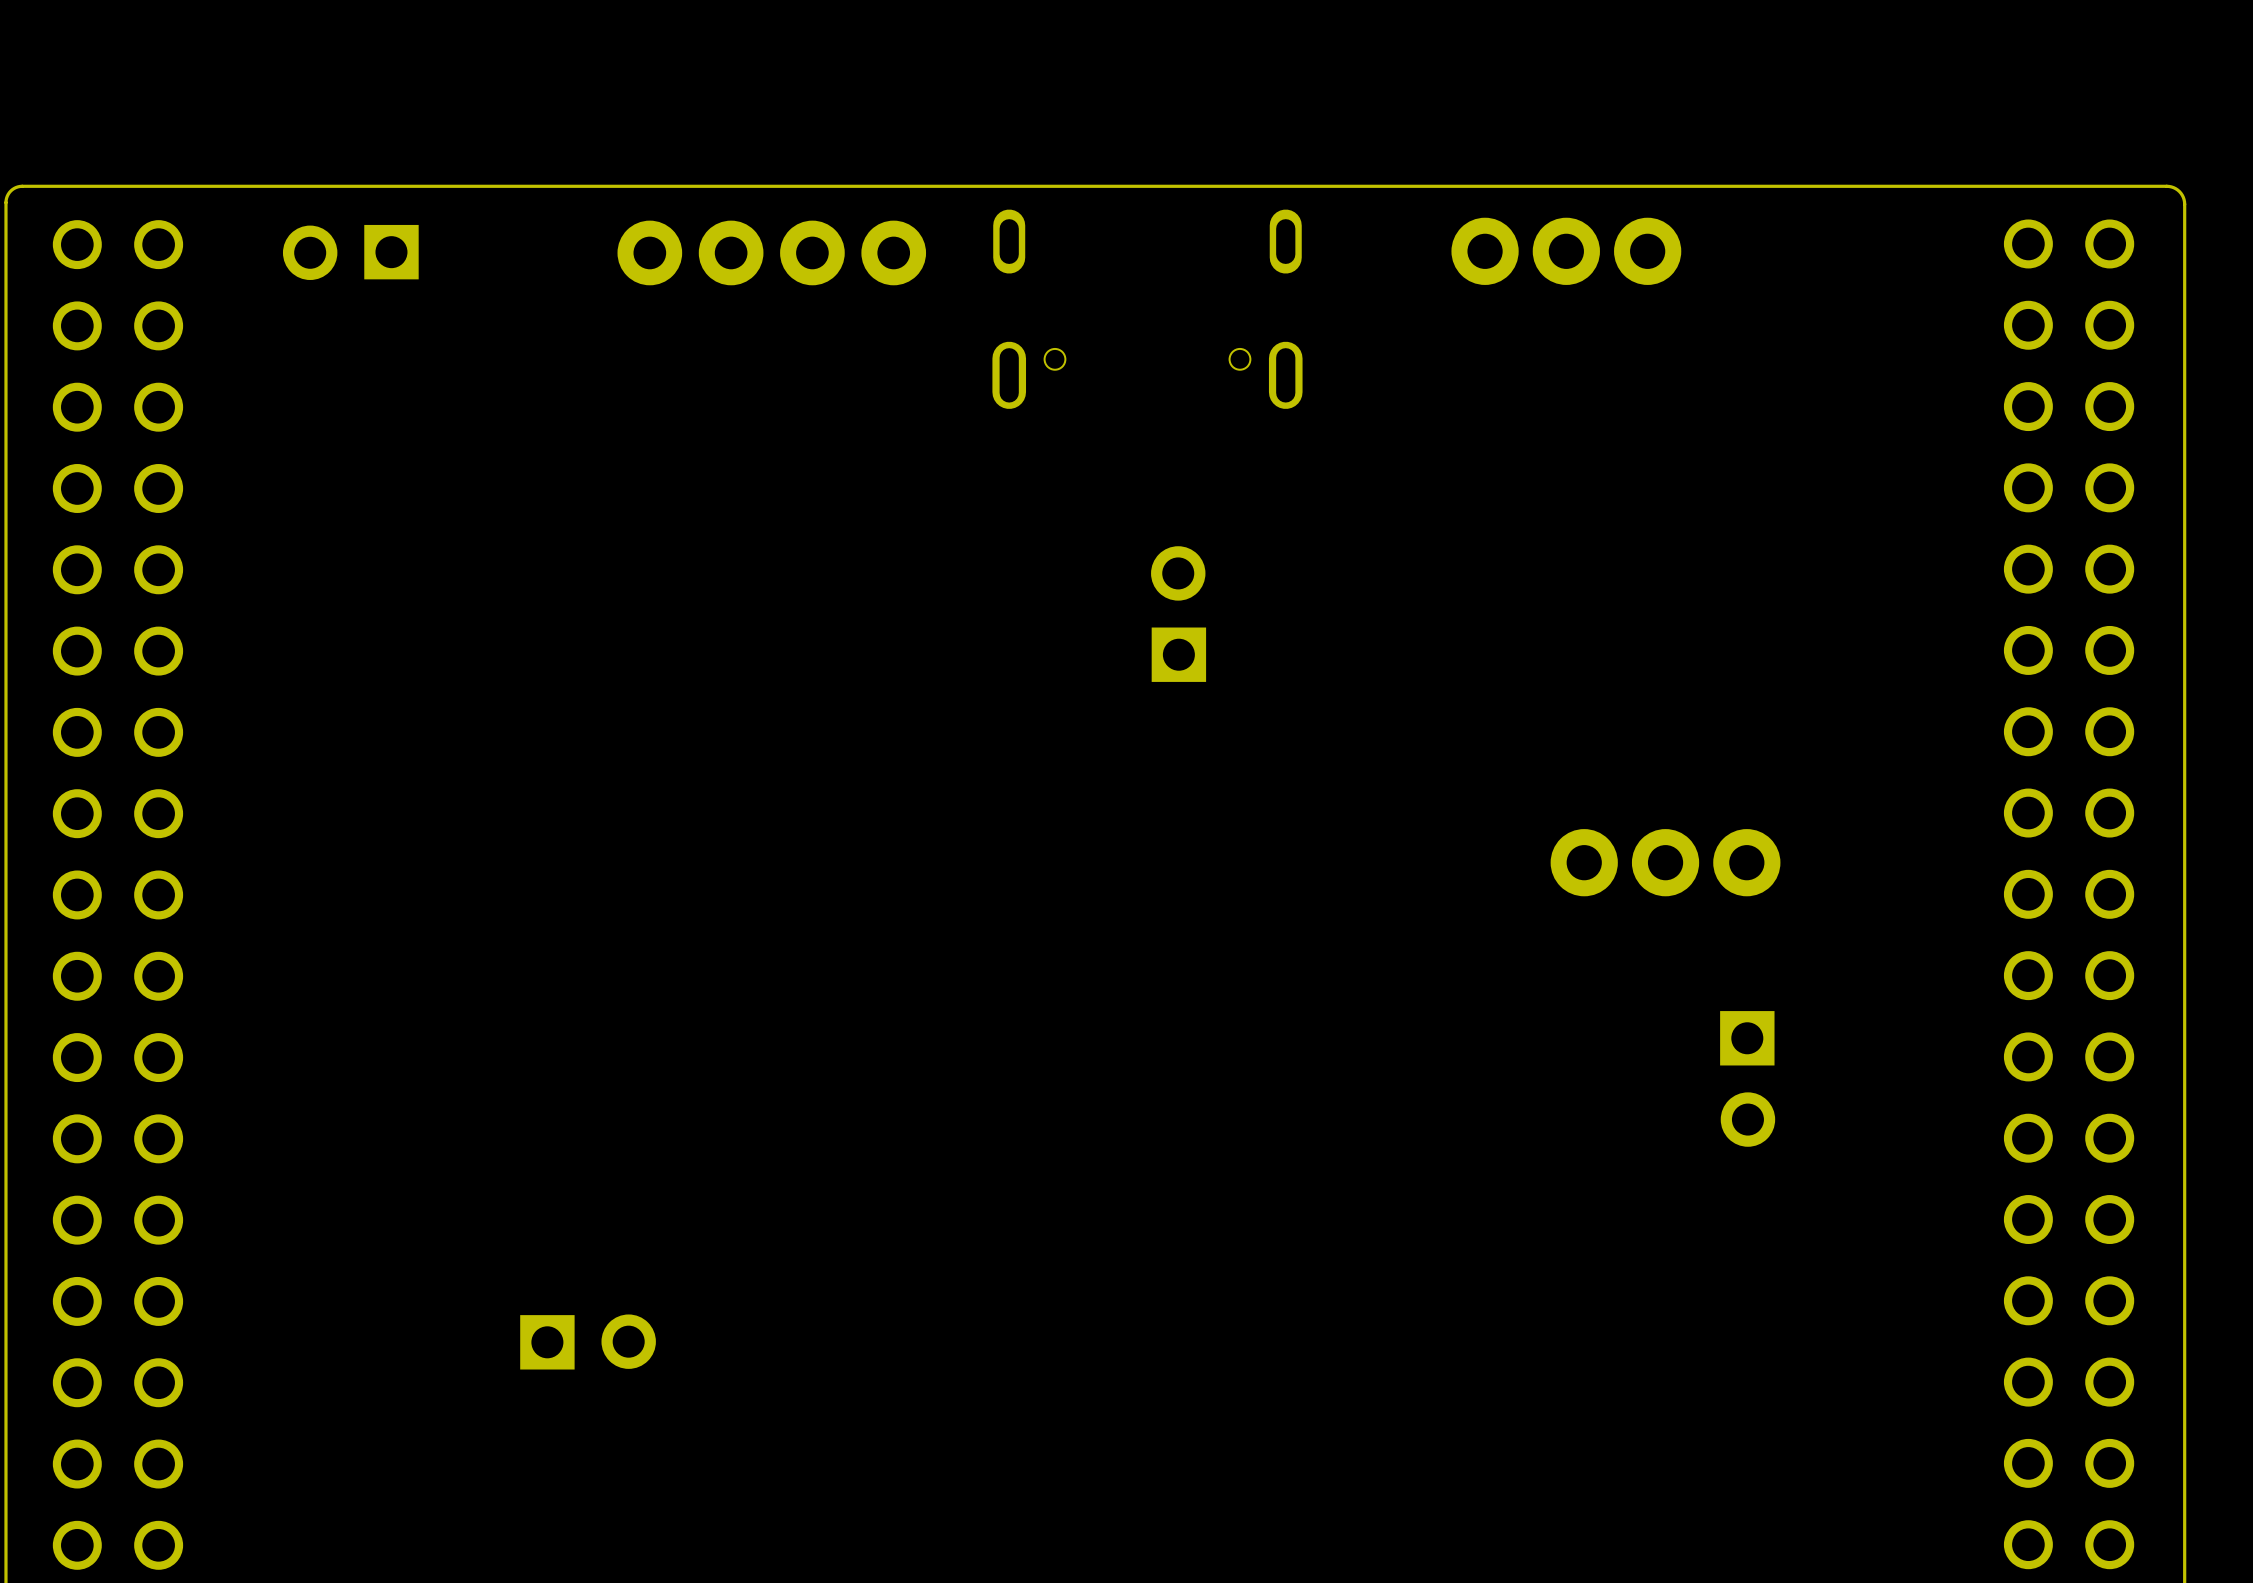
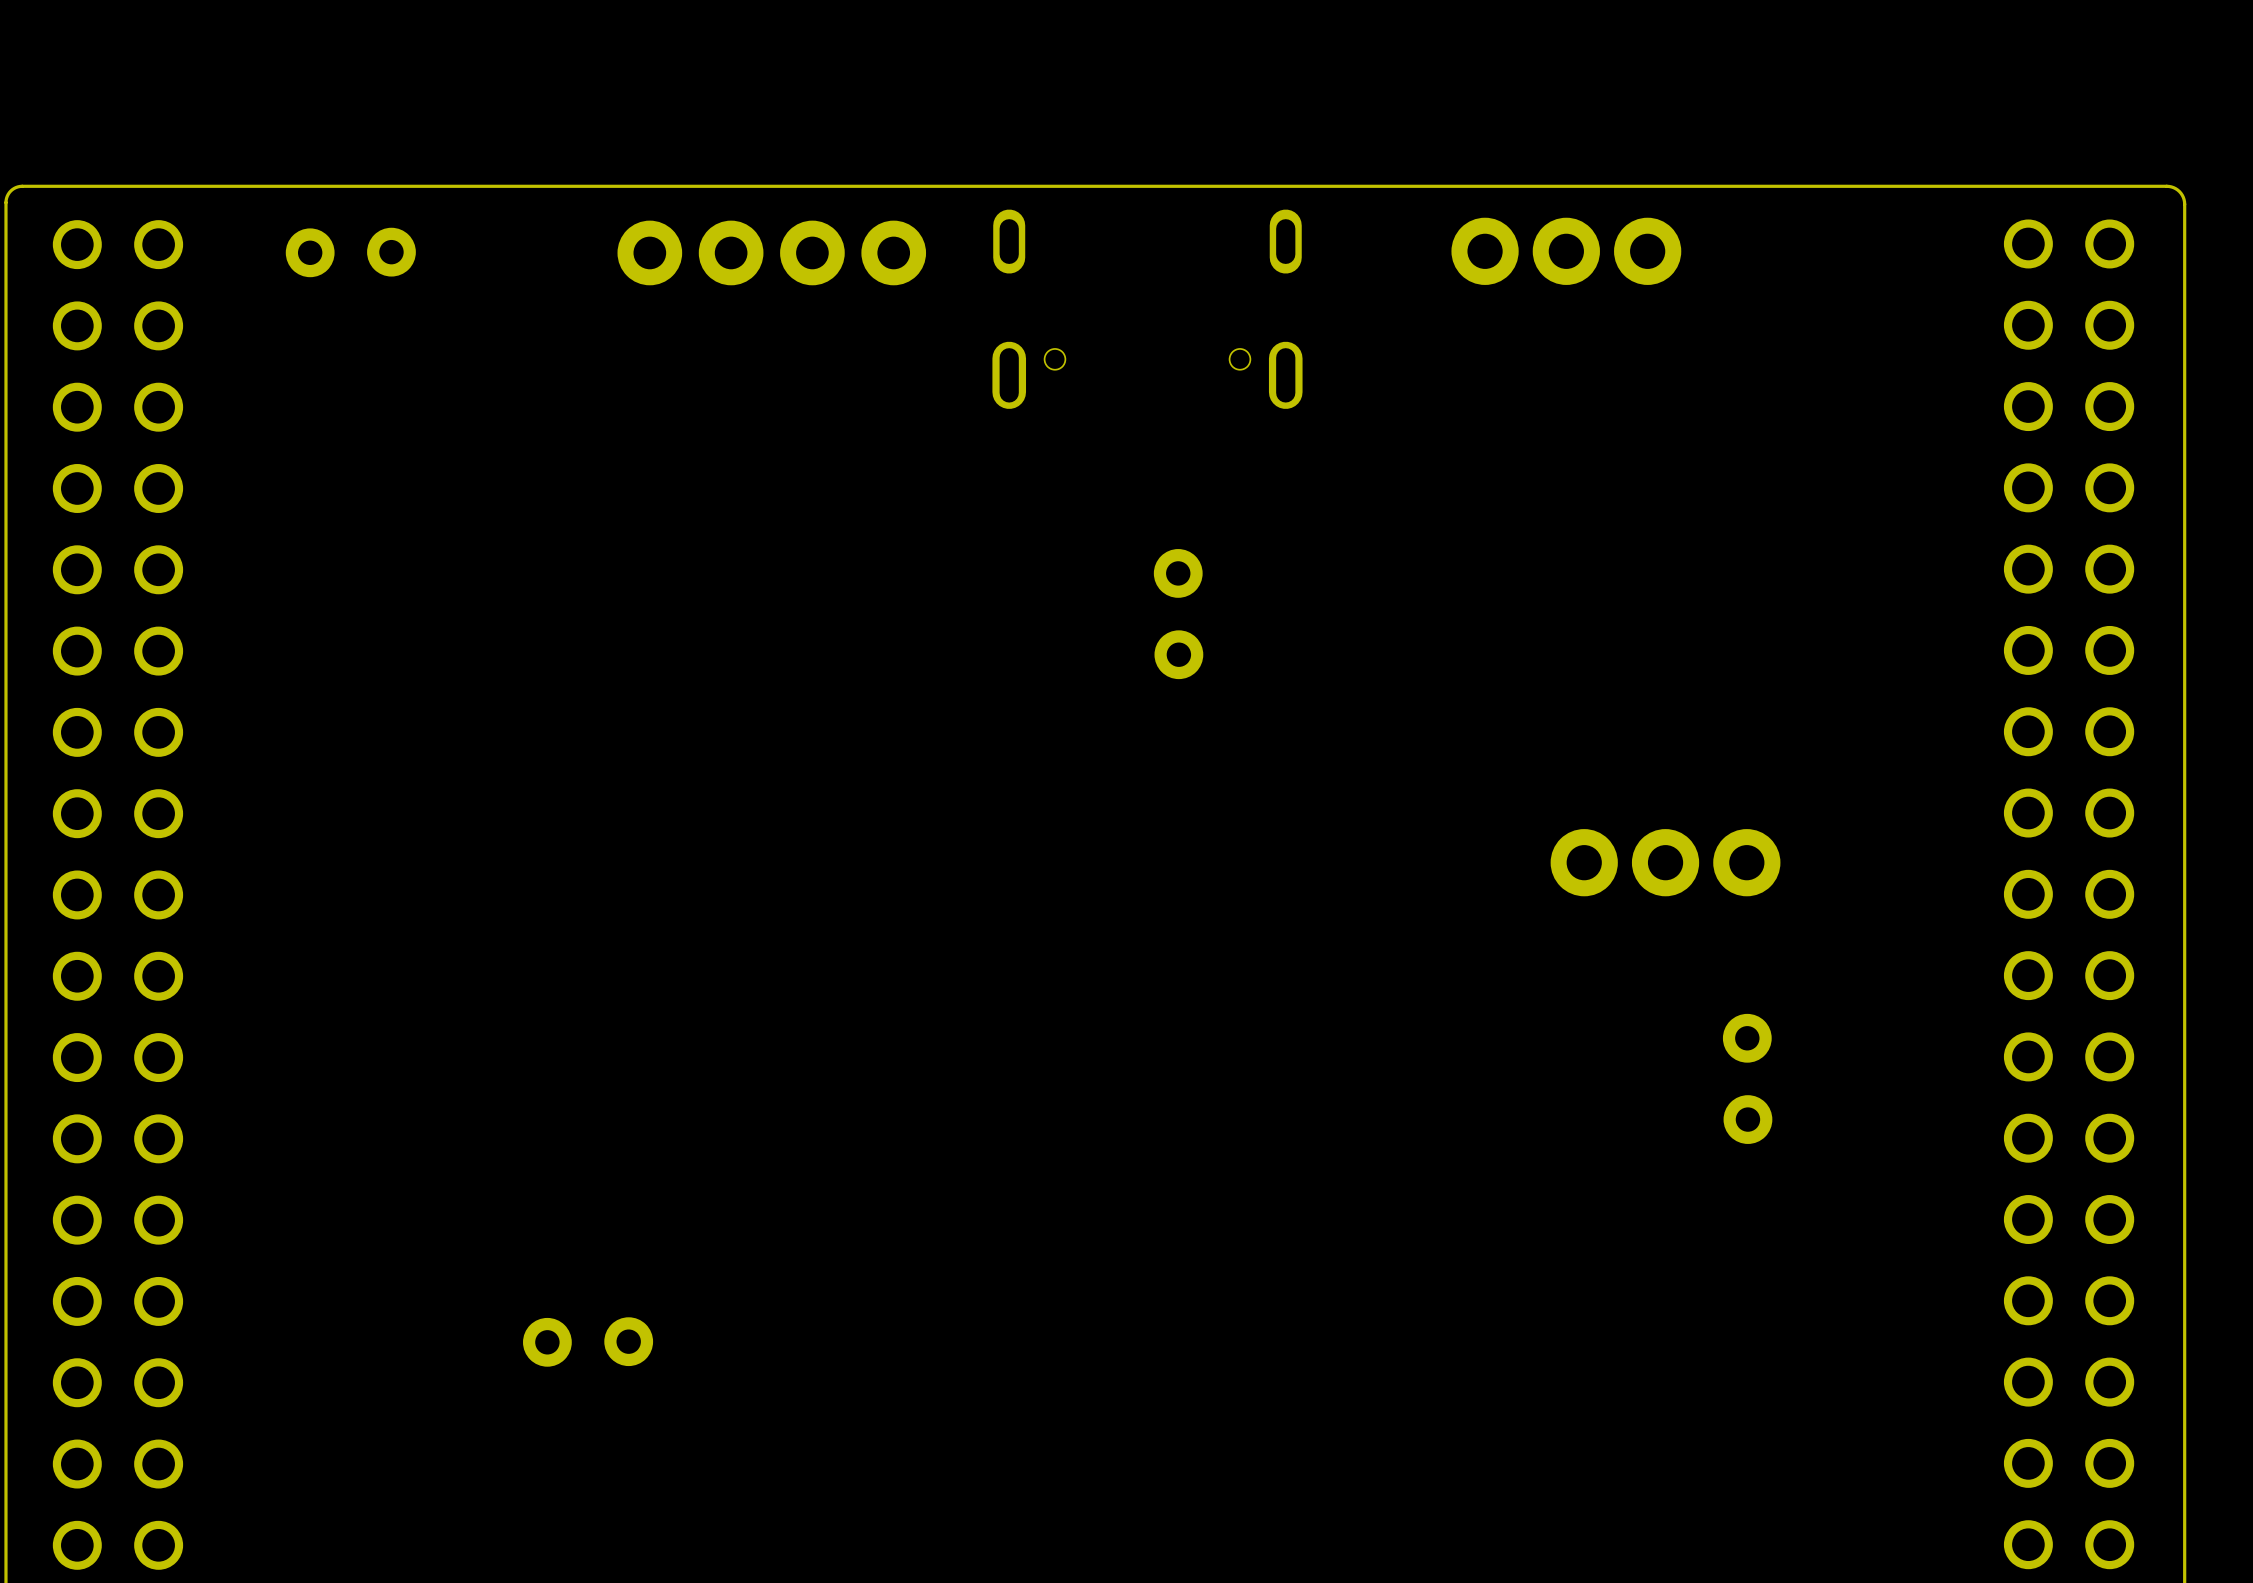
part footprint: [282, 224, 419, 281] -> [285, 227, 416, 278]
part footprint: [1151, 546, 1207, 682] -> [1153, 549, 1204, 680]
part footprint: [1720, 1011, 1776, 1147] -> [1722, 1013, 1773, 1144]
part footprint: [520, 1314, 656, 1370] -> [523, 1317, 654, 1367]

